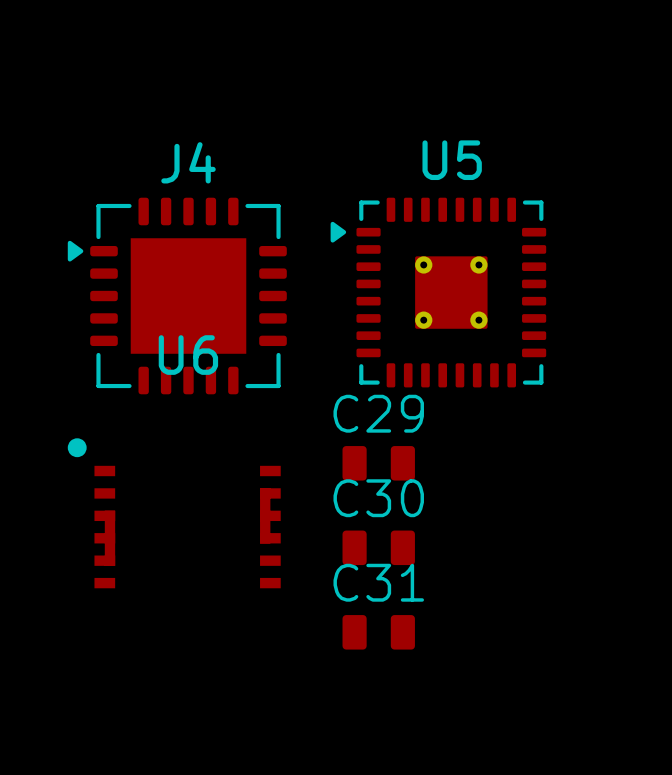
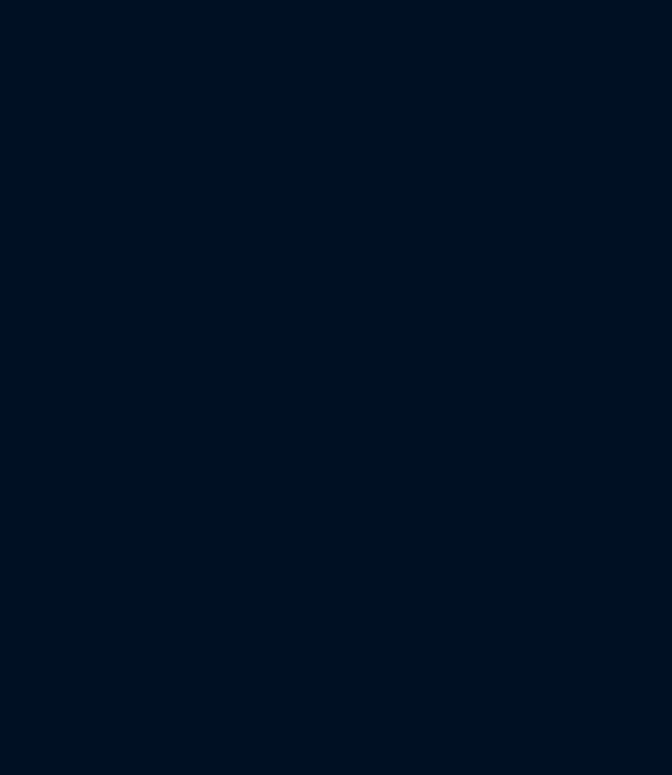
U5: (438, 292) -> none
J4: (177, 296) -> none
C29: (378, 463) -> none
U6: (174, 513) -> none
C30: (378, 547) -> none
C31: (378, 632) -> none

